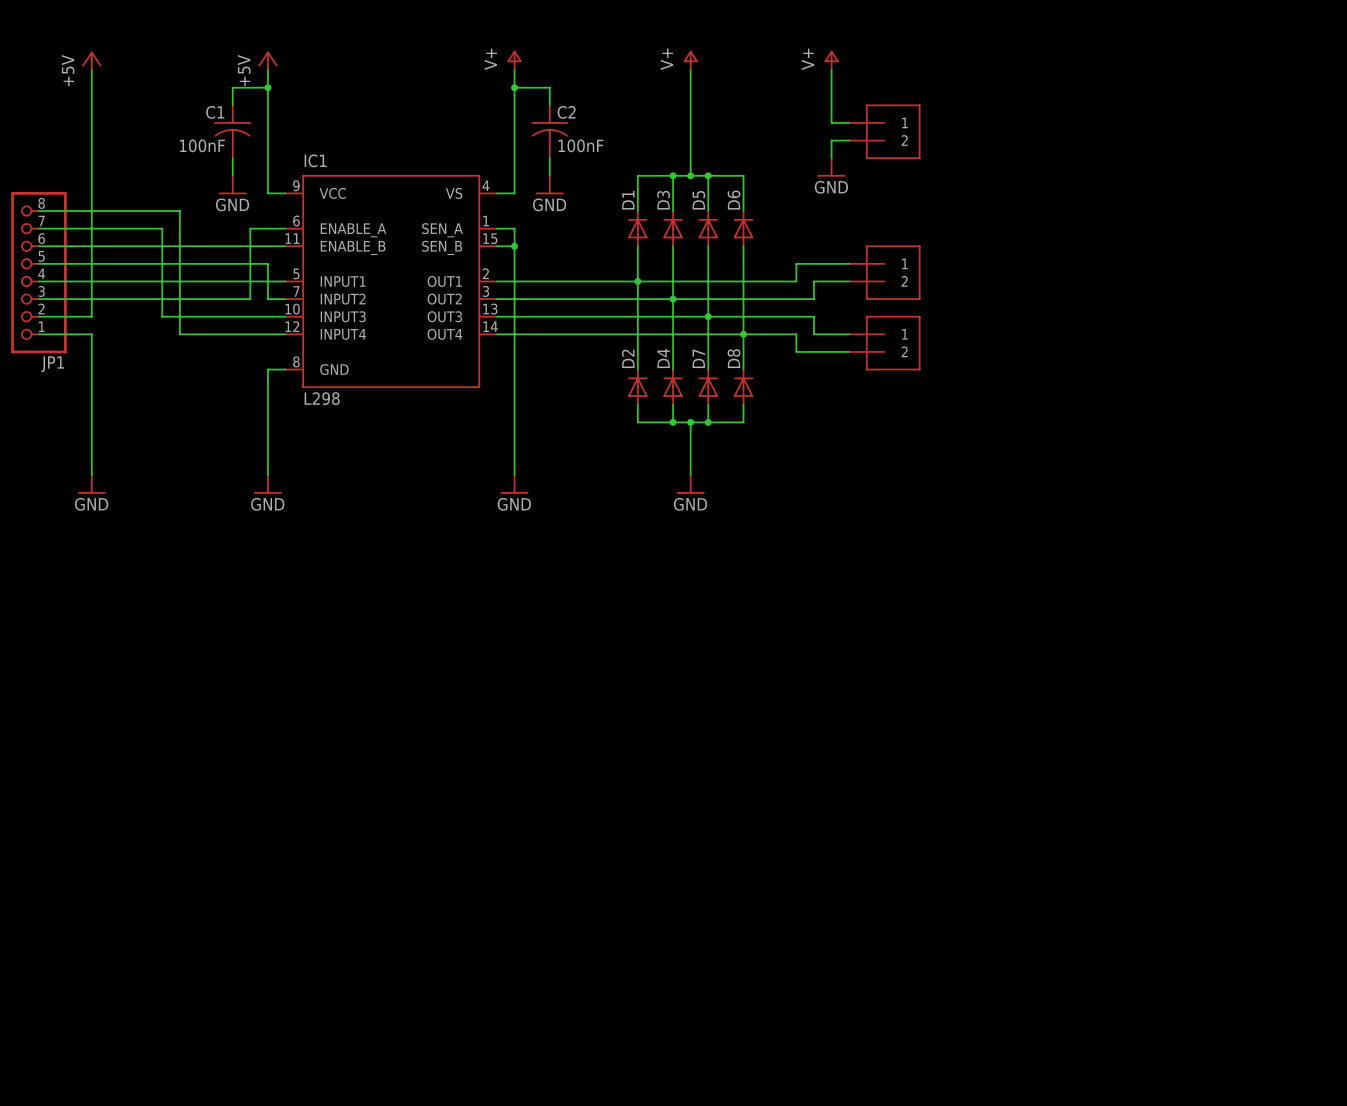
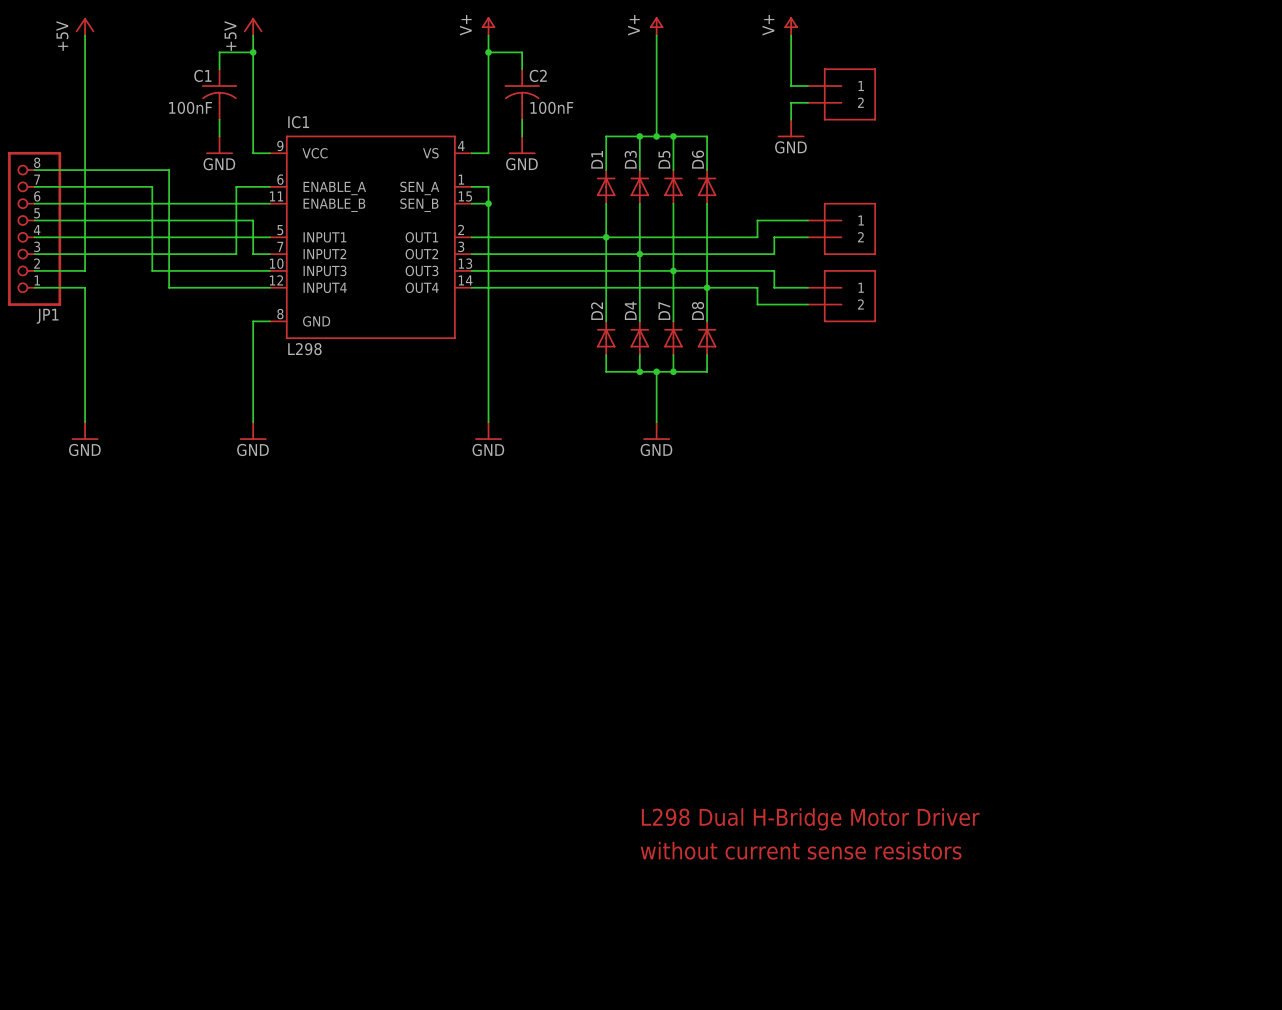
text: none -> L298 Dual H-Bridge Motor Driver (810, 819)
text: none -> without current sense resistors (801, 850)

